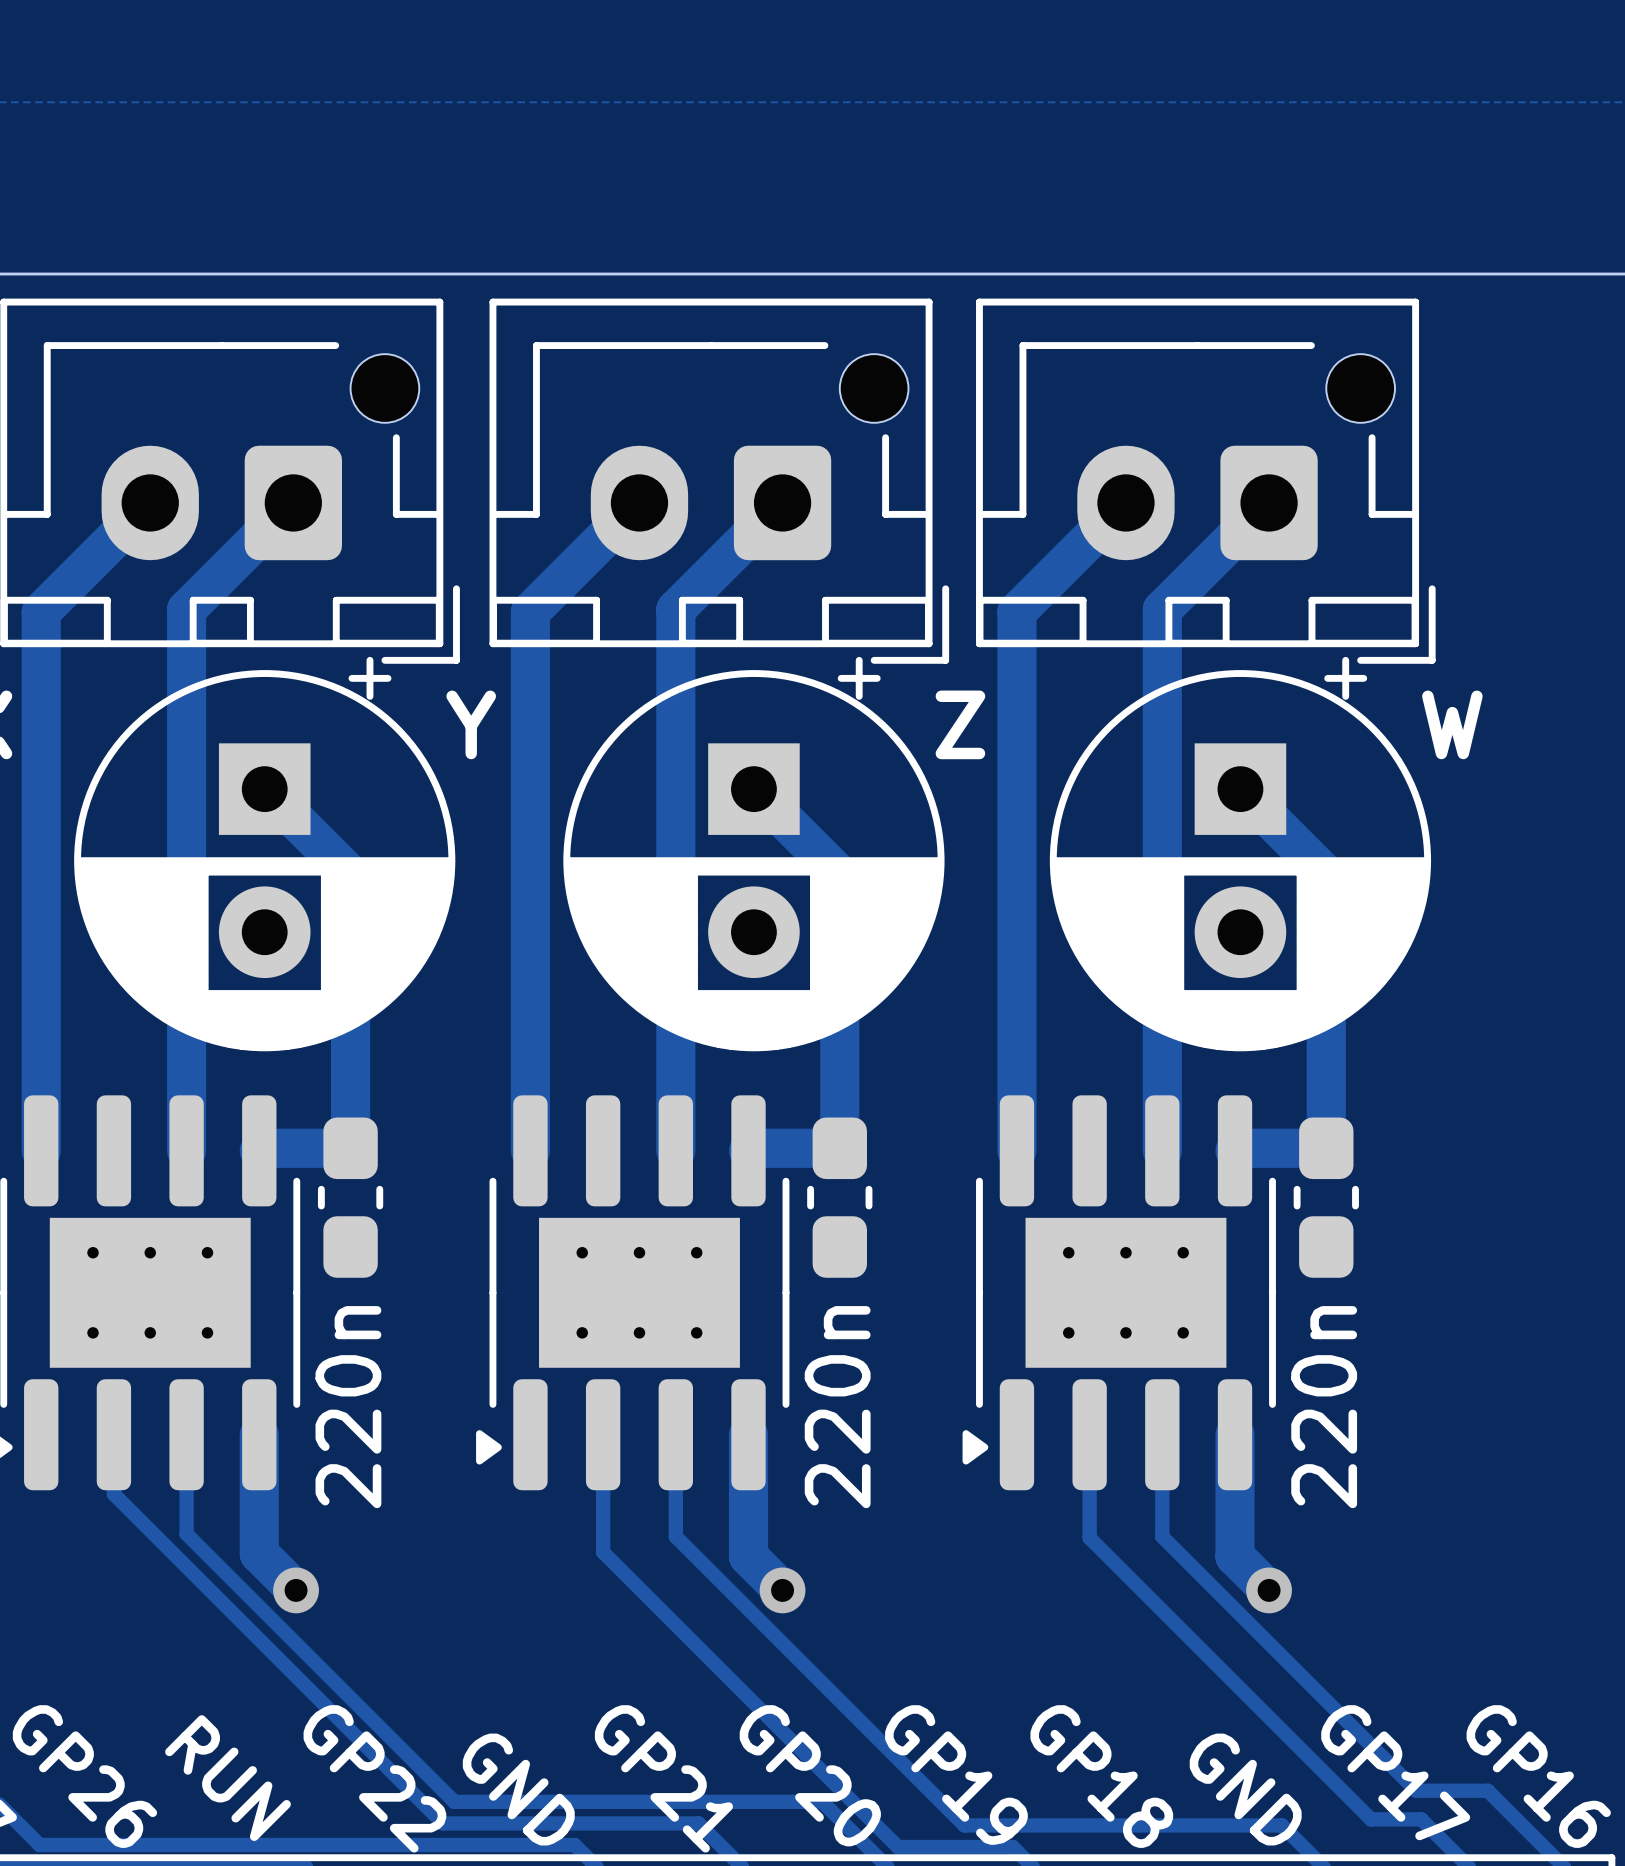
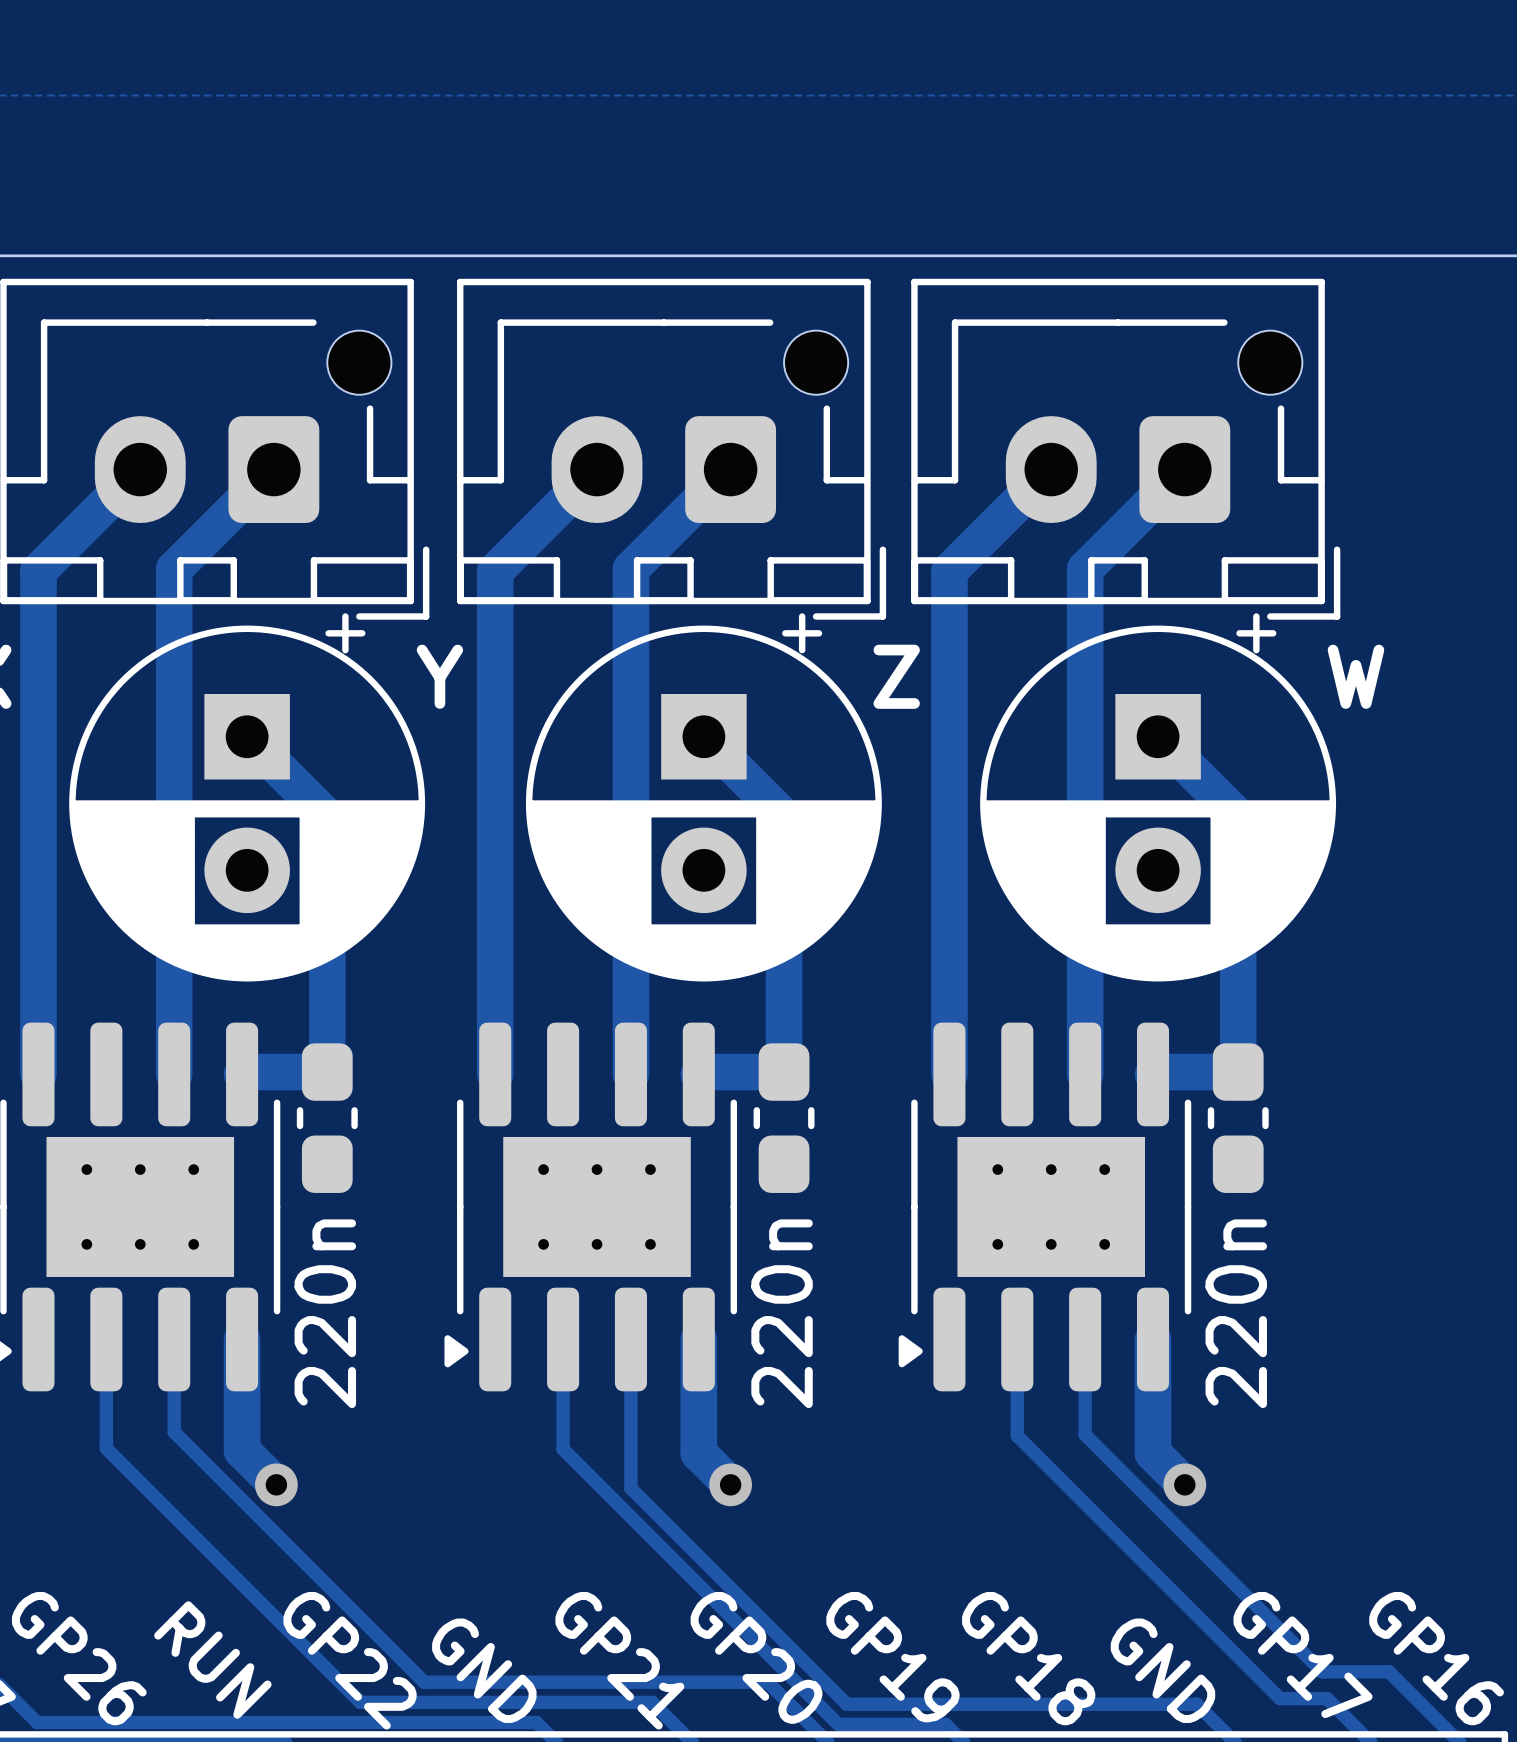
track: (113, 1494) (443, 1823) -> (106, 1394) (106, 1448) (360, 1702) (413, 1702)
track: (675, 1536) (964, 1825) -> (630, 1434) (630, 1488) (846, 1704) (900, 1704)

